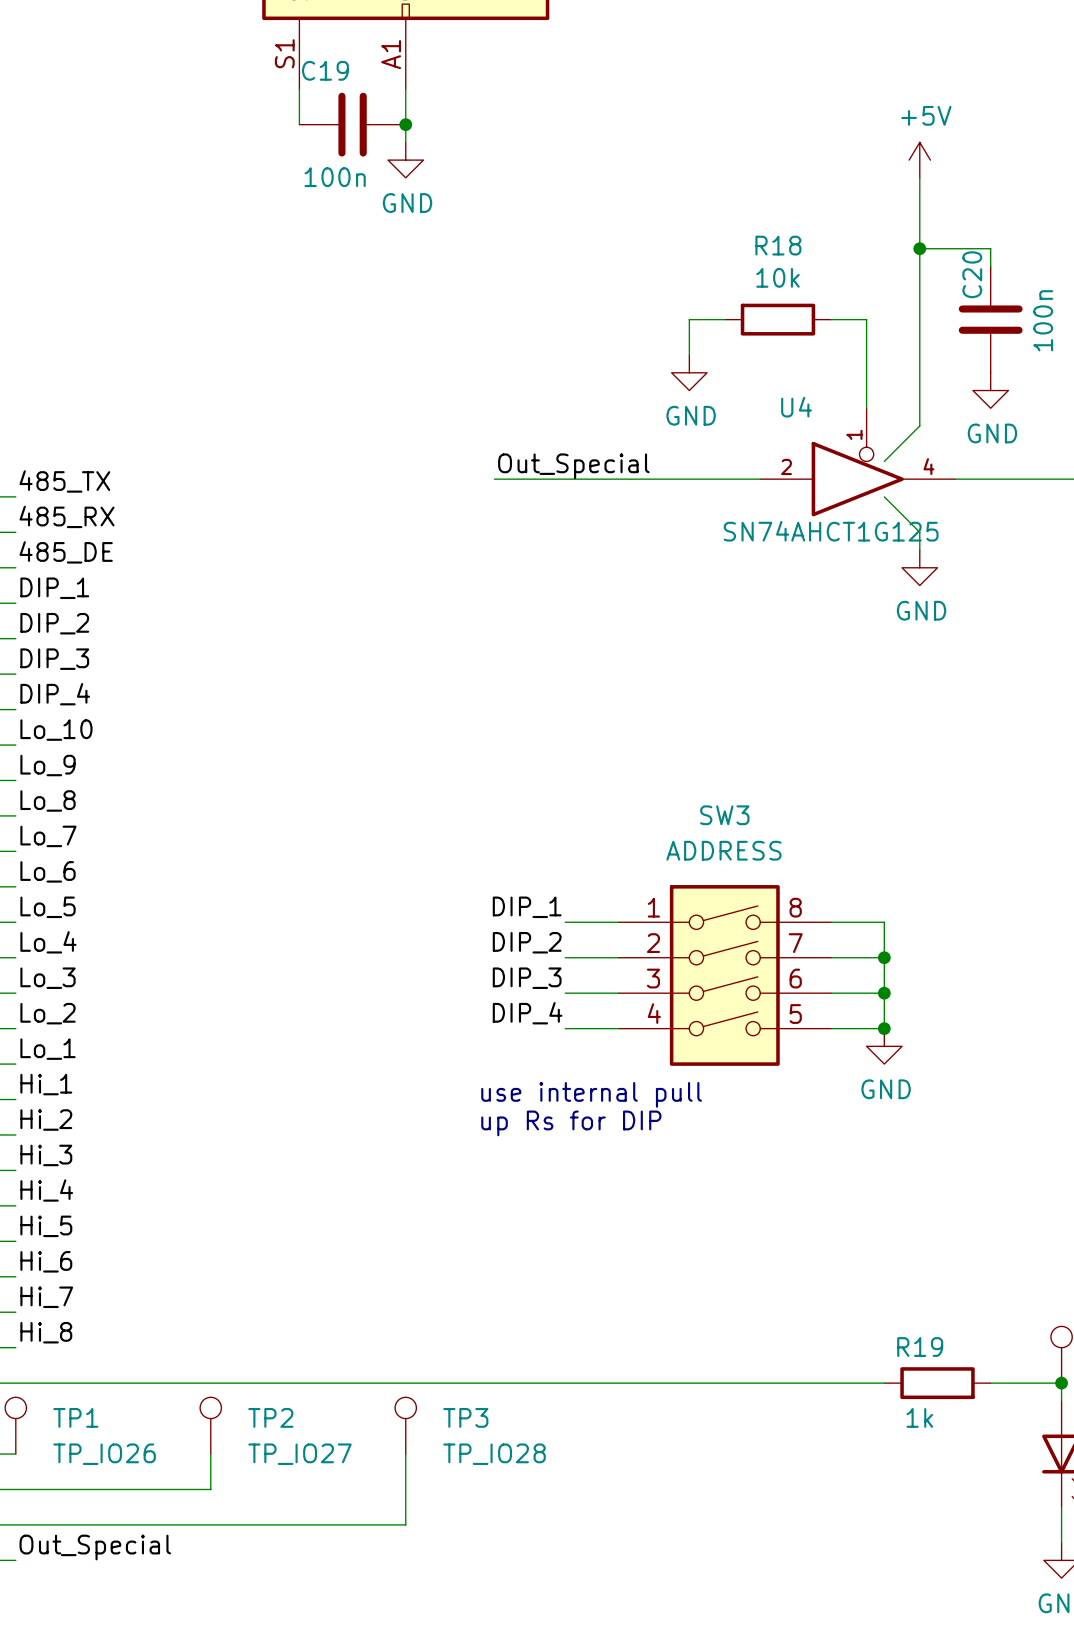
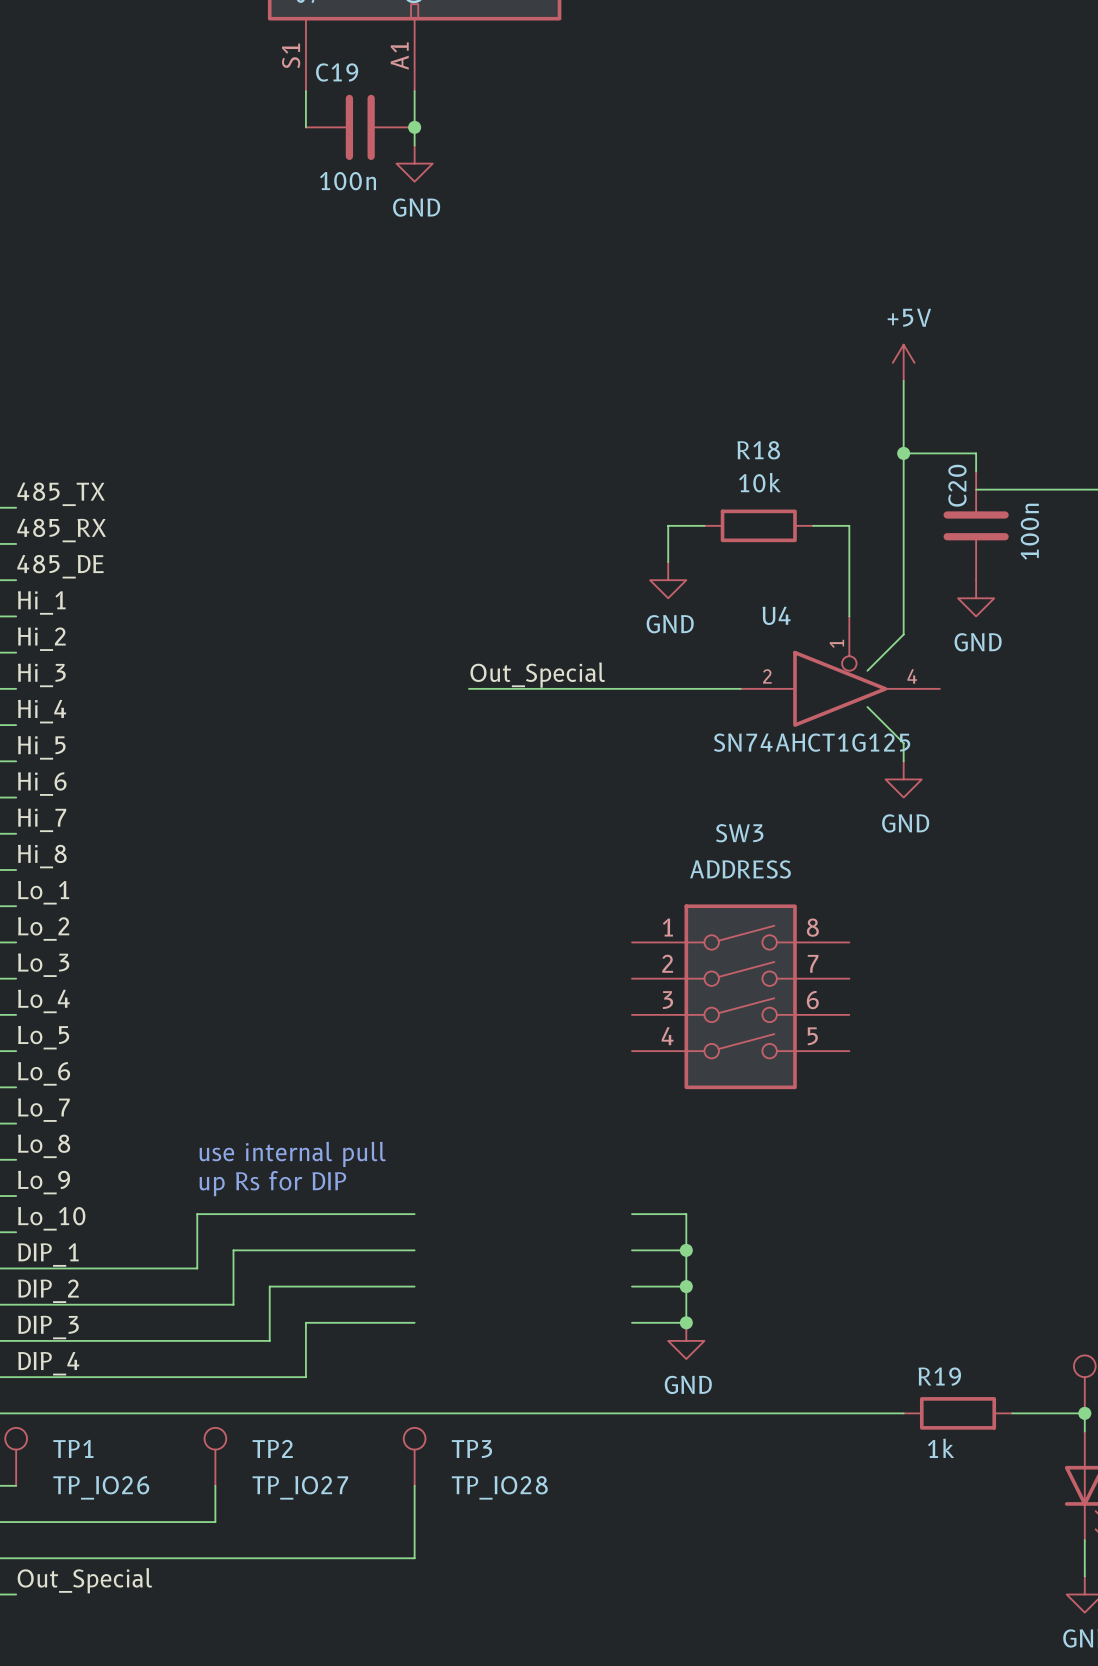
power symbol position: +5V (919, 160) -> +5V (903, 362)
wire: (919, 177) (919, 425) (884, 461) -> (903, 380) (903, 634) (867, 670)
wire: (919, 248) (990, 248) (990, 266) -> (903, 453) (976, 453) (976, 471)
junction: (919, 248) -> none
wire: (724, 319) (689, 319) (689, 355) -> (704, 525) (668, 525) (668, 562)
R18 position: (777, 319) -> (758, 525)
wire: (831, 319) (866, 319) (866, 408) -> (813, 525) (849, 525) (849, 616)
C20 position: (990, 319) -> (976, 525)
power symbol: GND (689, 372) -> none
power symbol: GND (990, 390) -> none
junction: none -> (903, 453)
U4 position: (857, 462) -> (840, 671)
label position: Out_Special (573, 466) -> Out_Special (537, 675)
wire: (494, 479) (760, 479) -> (468, 688) (740, 688)
wire: (884, 496) (919, 532) (919, 550) -> (867, 706) (903, 743) (903, 761)
power symbol: none -> GND (668, 580)
power symbol position: GND (919, 567) -> GND (976, 598)
label: DIP_1 (54, 588) -> Hi_1 (41, 602)
label: DIP_2 (54, 623) -> Hi_2 (41, 639)
label: DIP_3 (54, 659) -> Hi_3 (41, 675)
label: DIP_4 (55, 694) -> Hi_4 (42, 711)
label: Lo_10 (56, 730) -> Hi_5 (41, 747)
power symbol: none -> GND (903, 779)
label: Lo_9 (48, 765) -> Hi_6 (42, 784)
label: Lo_8 (48, 800) -> Hi_7 (42, 820)
label: Lo_7 (48, 836) -> Hi_8 (42, 856)
label: Lo_6 (48, 871) -> Lo_1 (43, 892)
label: Lo_5 (48, 907) -> Lo_2 (43, 928)
label: DIP_1 (527, 907) -> none
wire: (565, 922) (618, 922) -> none
wire: (831, 922) (884, 922) (884, 1028) (831, 1028) -> (631, 1214) (686, 1214) (686, 1322) (631, 1322)
label: Lo_4 (48, 942) -> Lo_3 (43, 965)
label: DIP_2 (527, 942) -> none
wire: (565, 957) (618, 957) -> none
wire: (831, 957) (884, 957) -> none
junction: (884, 957) -> none
label: Lo_3 (48, 978) -> Lo_4 (43, 1001)
label: DIP_3 (527, 978) -> none
wire: (565, 993) (618, 993) -> none
wire: (831, 993) (884, 993) -> (631, 1286) (686, 1286)
junction: (884, 993) -> none
label: Lo_2 (48, 1013) -> Lo_5 (43, 1037)
label: DIP_4 (527, 1013) -> none
wire: (565, 1028) (618, 1028) -> (631, 1250) (686, 1250)
junction: (884, 1028) -> none
power symbol: GND (884, 1046) -> none
label: Lo_1 (48, 1049) -> Lo_6 (44, 1073)
label: Hi_1 (46, 1084) -> Lo_7 (43, 1110)
text position: use internal pull (591, 1094) -> use internal pull (292, 1154)
label: Hi_2 (46, 1120) -> Lo_8 (44, 1146)
text position: up Rs for DIP (571, 1123) -> up Rs for DIP (272, 1183)
label: Hi_3 (46, 1155) -> Lo_9 (44, 1182)
wire: none -> (414, 1214) (197, 1214) (197, 1268) (16, 1268)
label: Hi_4 (46, 1190) -> Lo_10 (51, 1218)
wire: none -> (414, 1250) (233, 1250) (233, 1304) (16, 1304)
junction: none -> (686, 1250)
label: Hi_5 (46, 1226) -> DIP_1 (48, 1255)
wire: none -> (414, 1286) (269, 1286) (269, 1340) (16, 1340)
junction: none -> (686, 1286)
label: Hi_6 (46, 1261) -> DIP_2 (48, 1291)
wire: none -> (414, 1322) (305, 1322) (305, 1377) (16, 1377)
junction: none -> (686, 1322)
label: Hi_7 (46, 1297) -> DIP_3 (48, 1327)
power symbol: none -> GND (686, 1340)
label: Hi_8 (46, 1332) -> DIP_4 (48, 1363)

